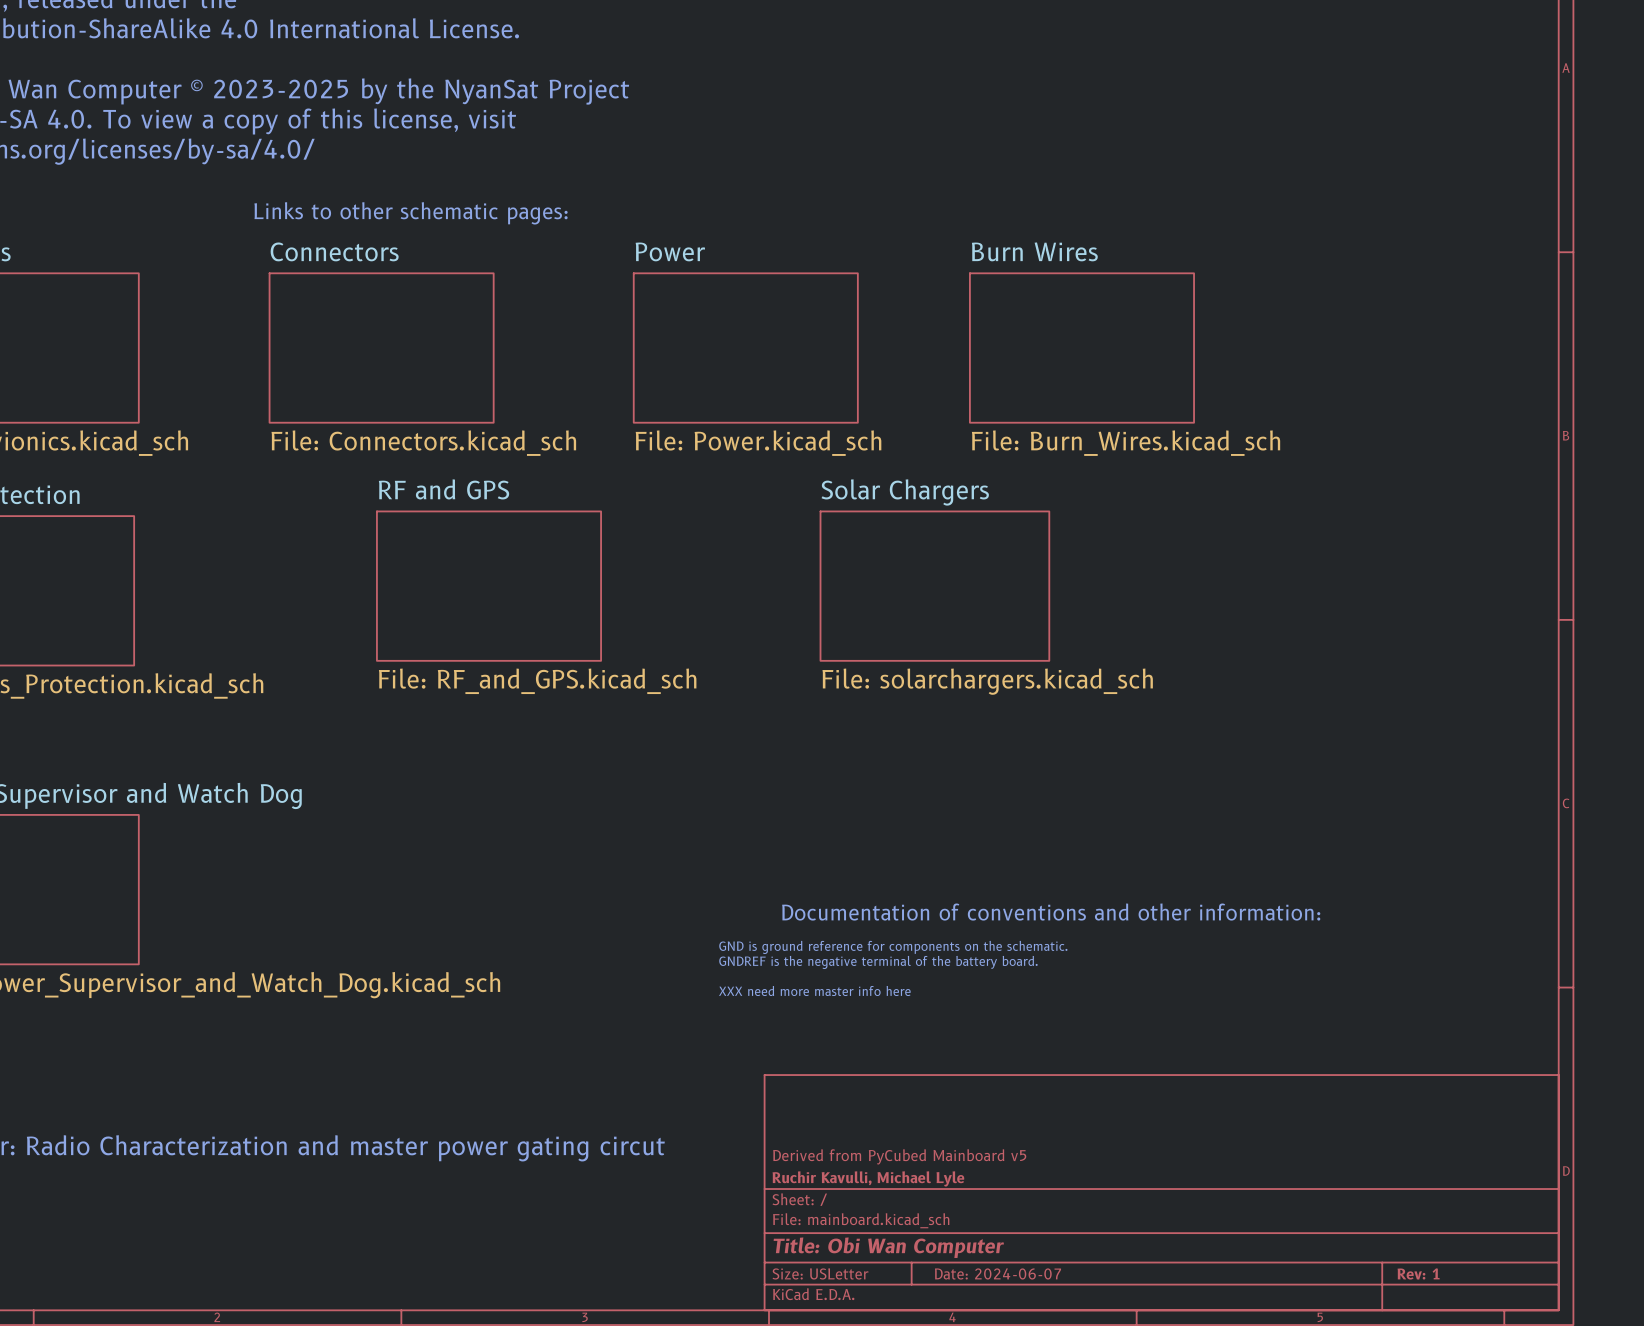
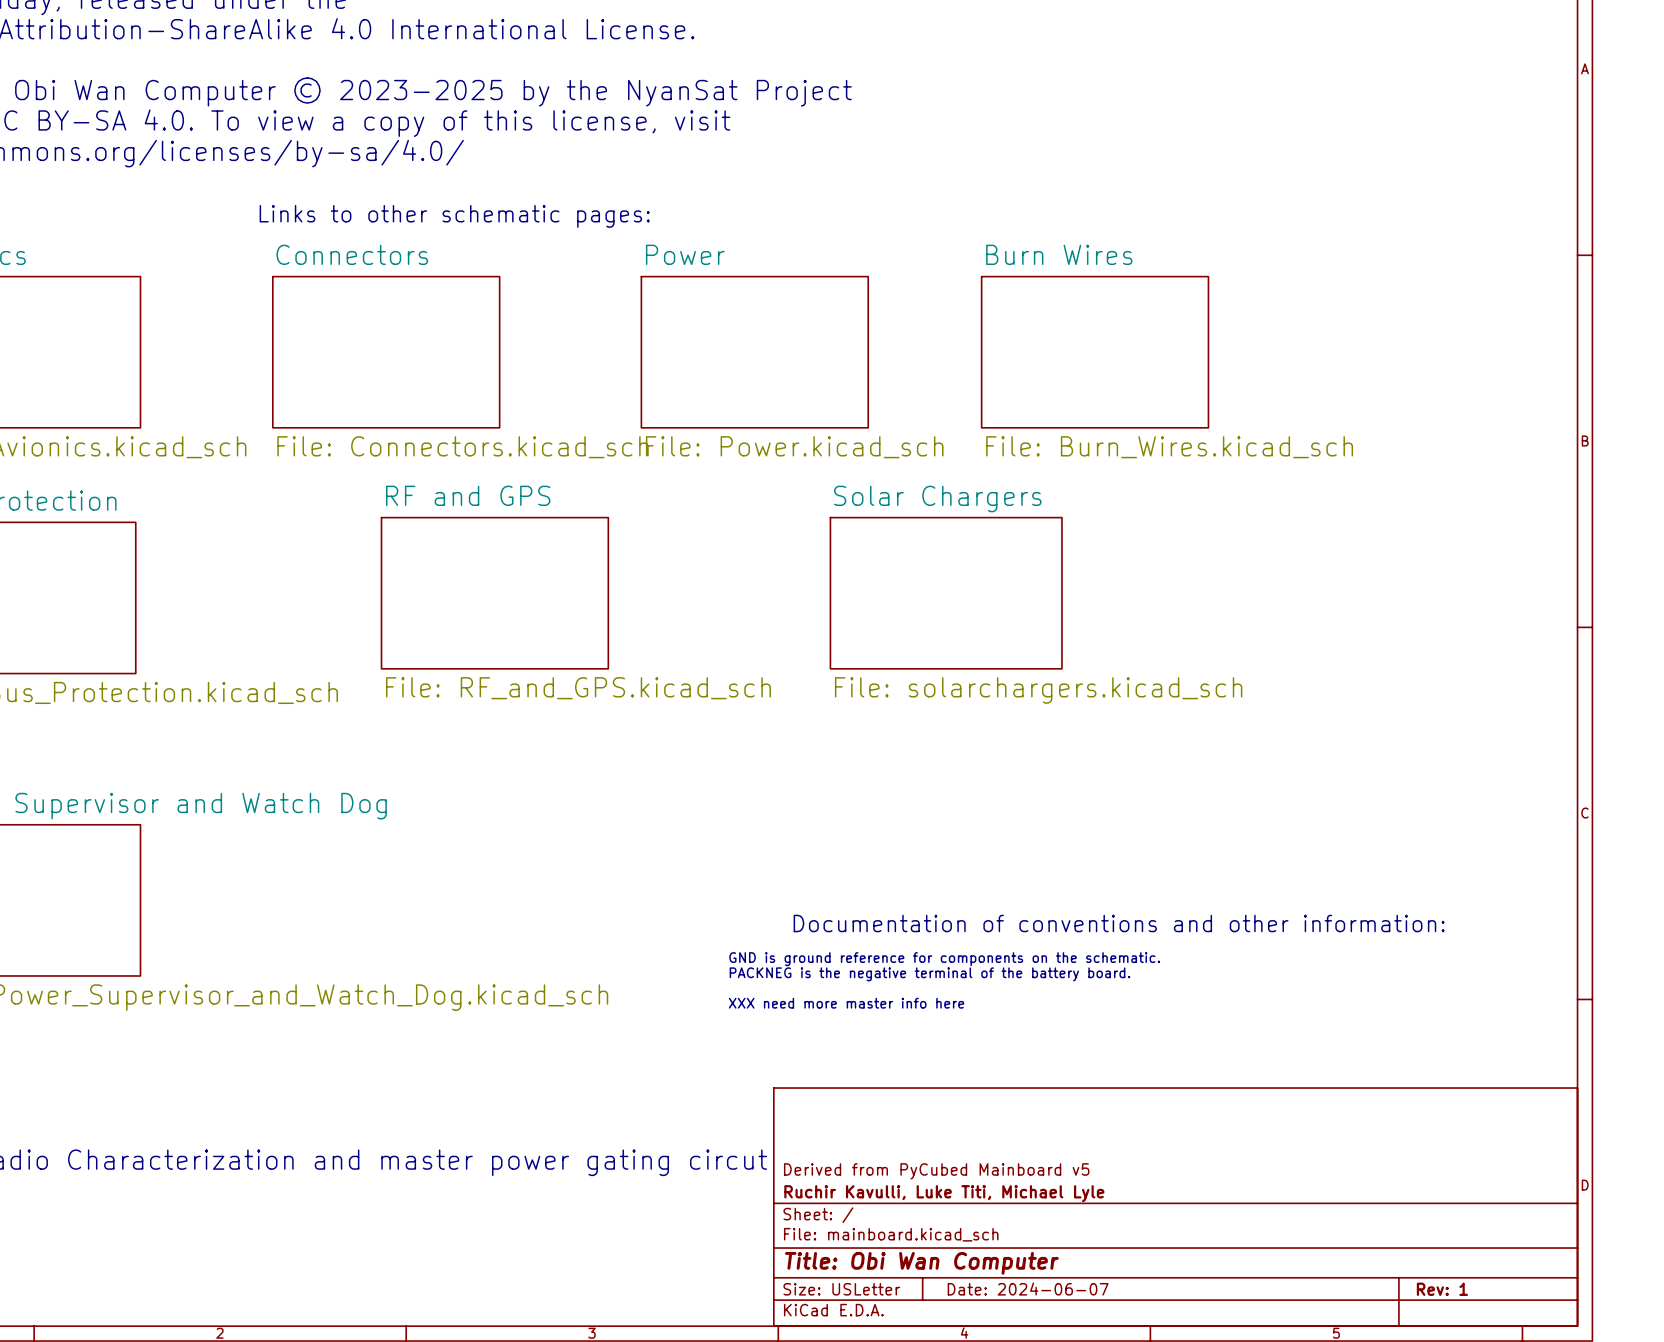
text: GNDREF is the negative terminal of the battery board. (878, 962) -> PACKNEG is the negative terminal of the battery board. (930, 974)
title block: Ruchir Kavulli, Michael Lyle (868, 1178) -> Ruchir Kavulli, Luke Titi, Michael Lyle (944, 1193)

